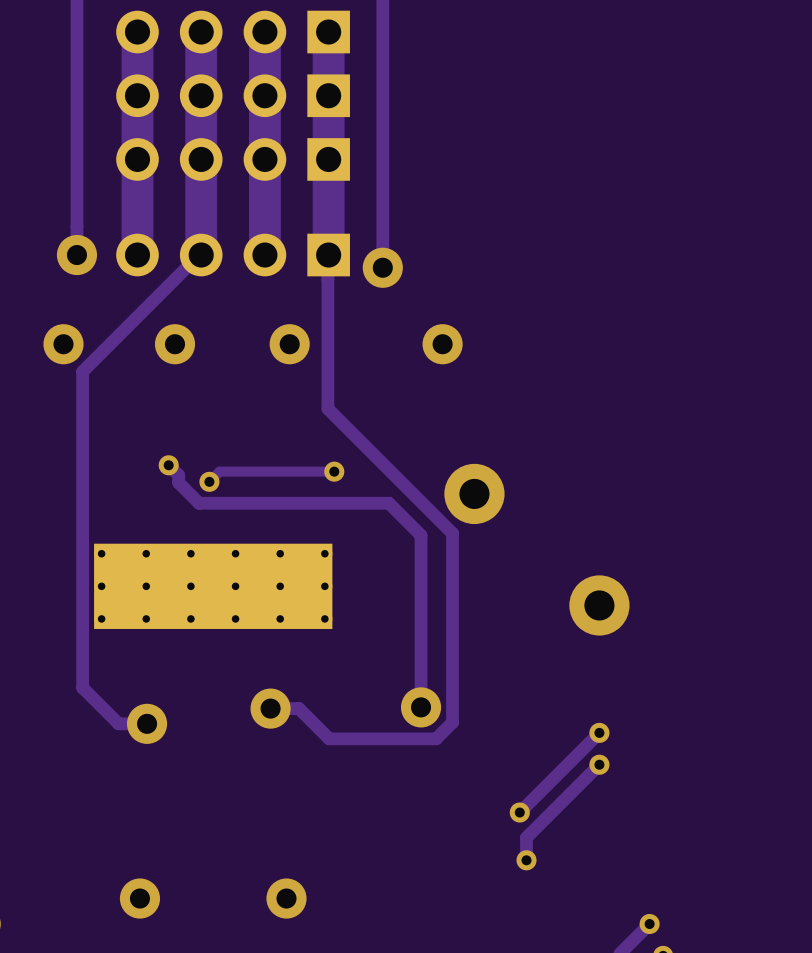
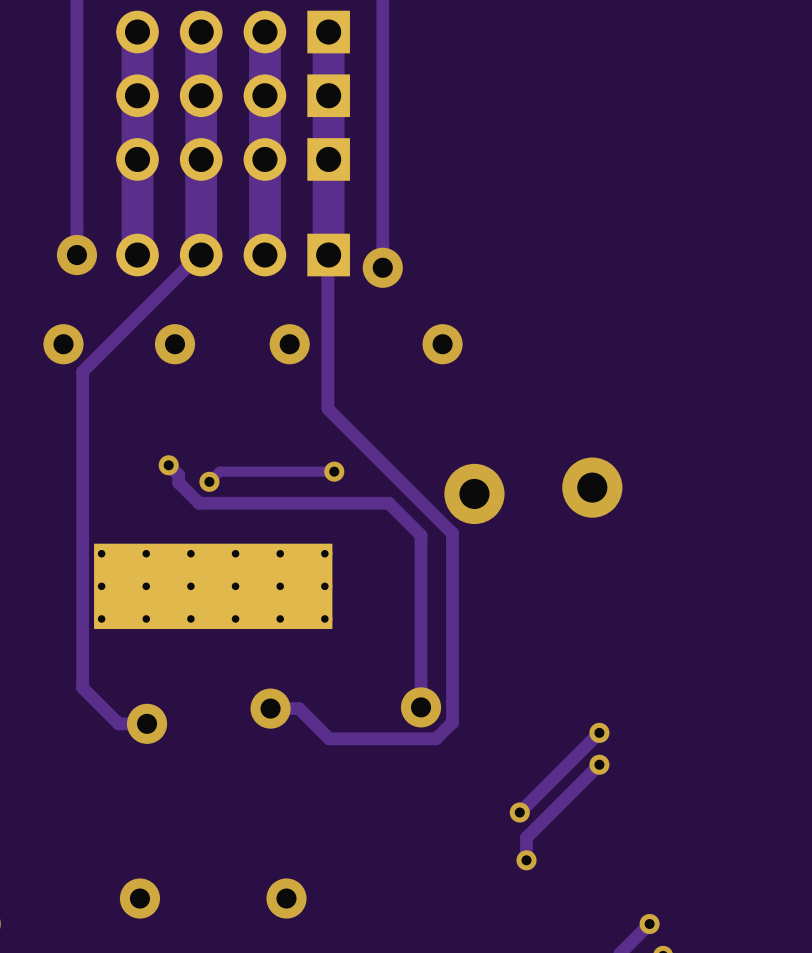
via position: (599, 605) -> (592, 487)

